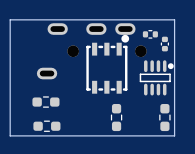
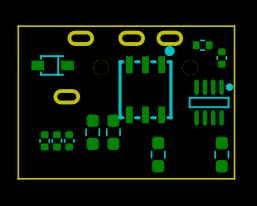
part: none -> (52, 65)
part: none -> (92, 132)
part: none -> (113, 132)
part: (45, 102) -> none
part: none -> (44, 140)
part: none -> (56, 140)
part: none -> (69, 140)
part: (46, 126) -> none

